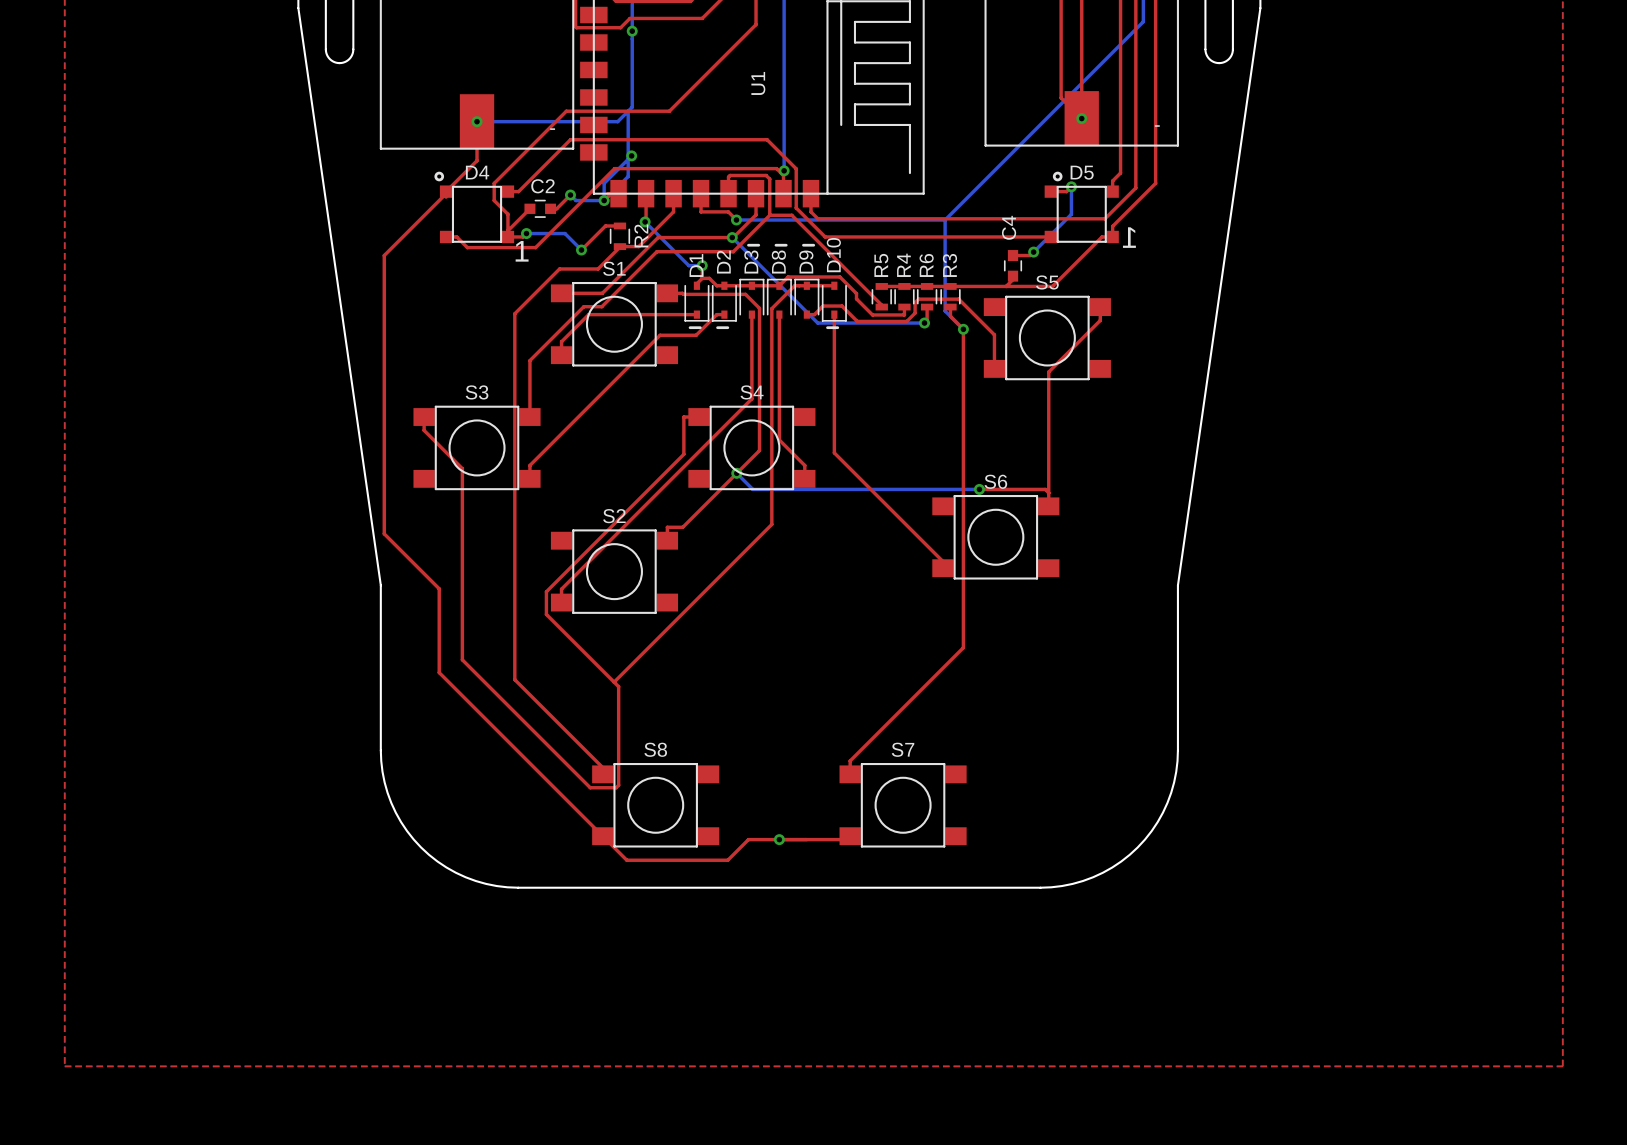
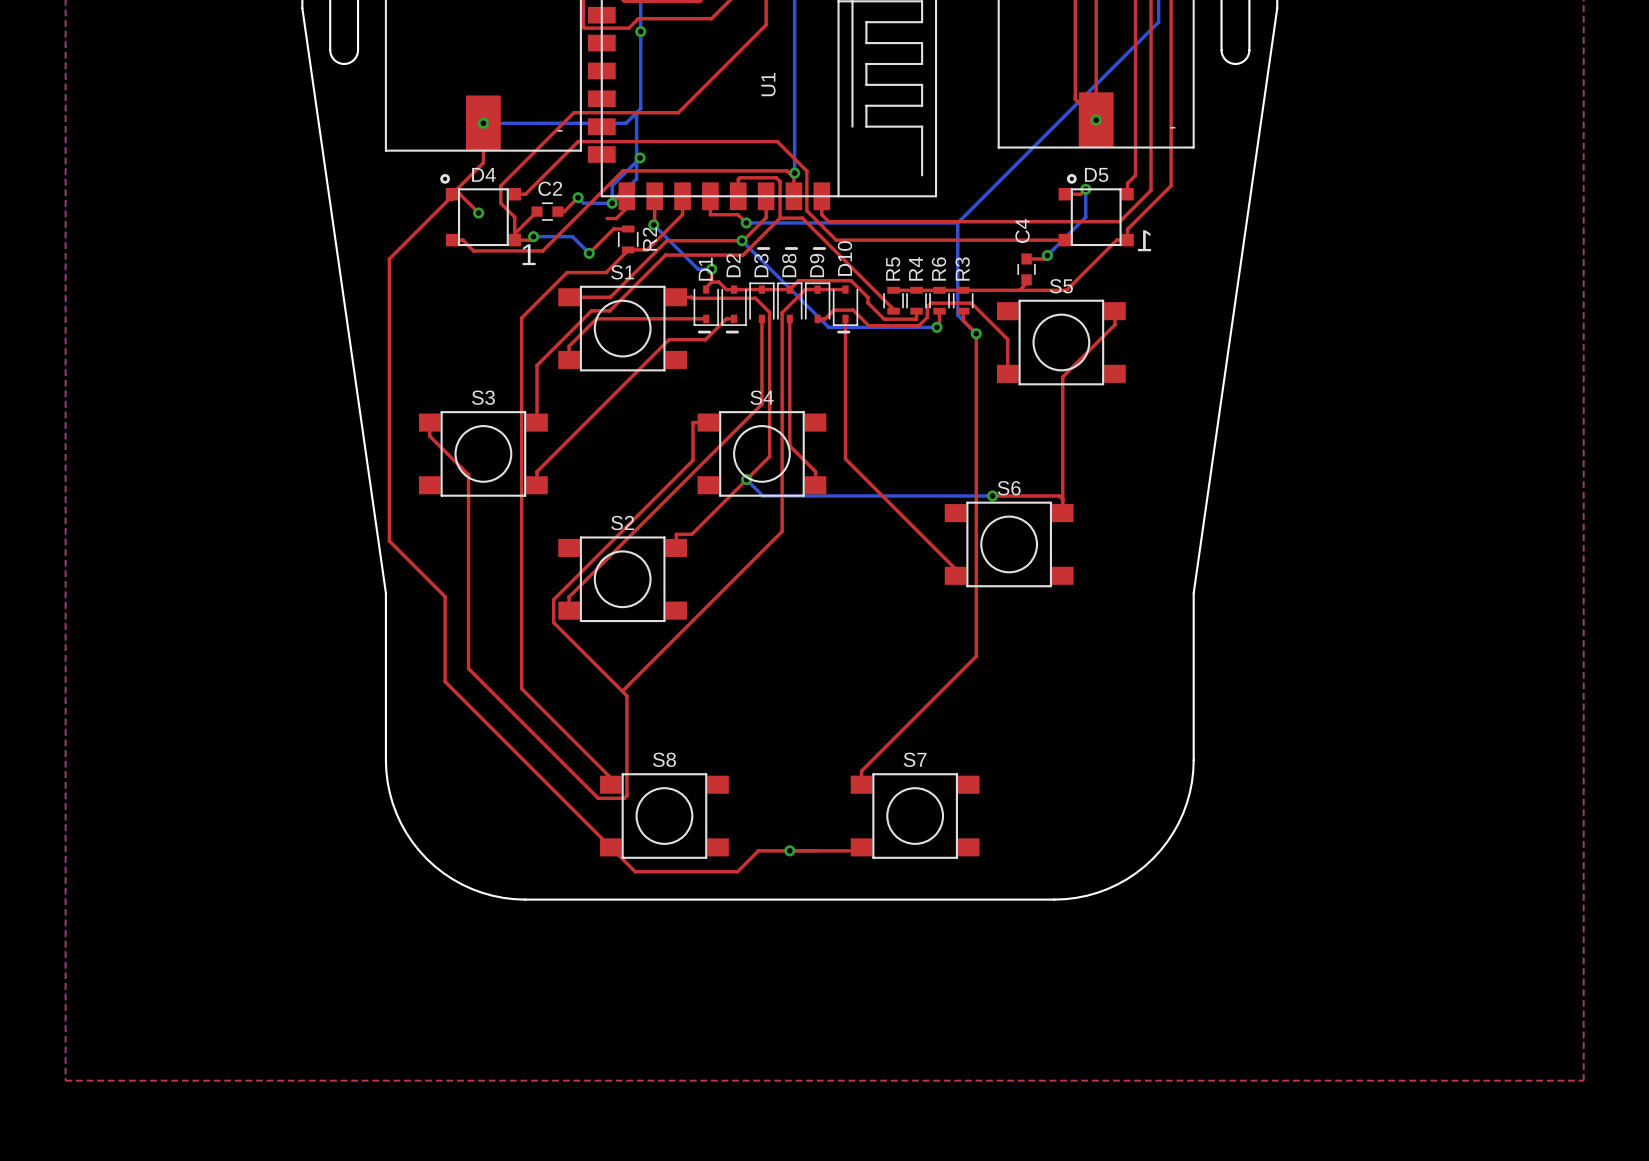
top track: none -> (452, 194) (459, 194) (478, 212)
top track: none -> (626, 196) (626, 207) (616, 218) (607, 218)
via: none -> (478, 212)

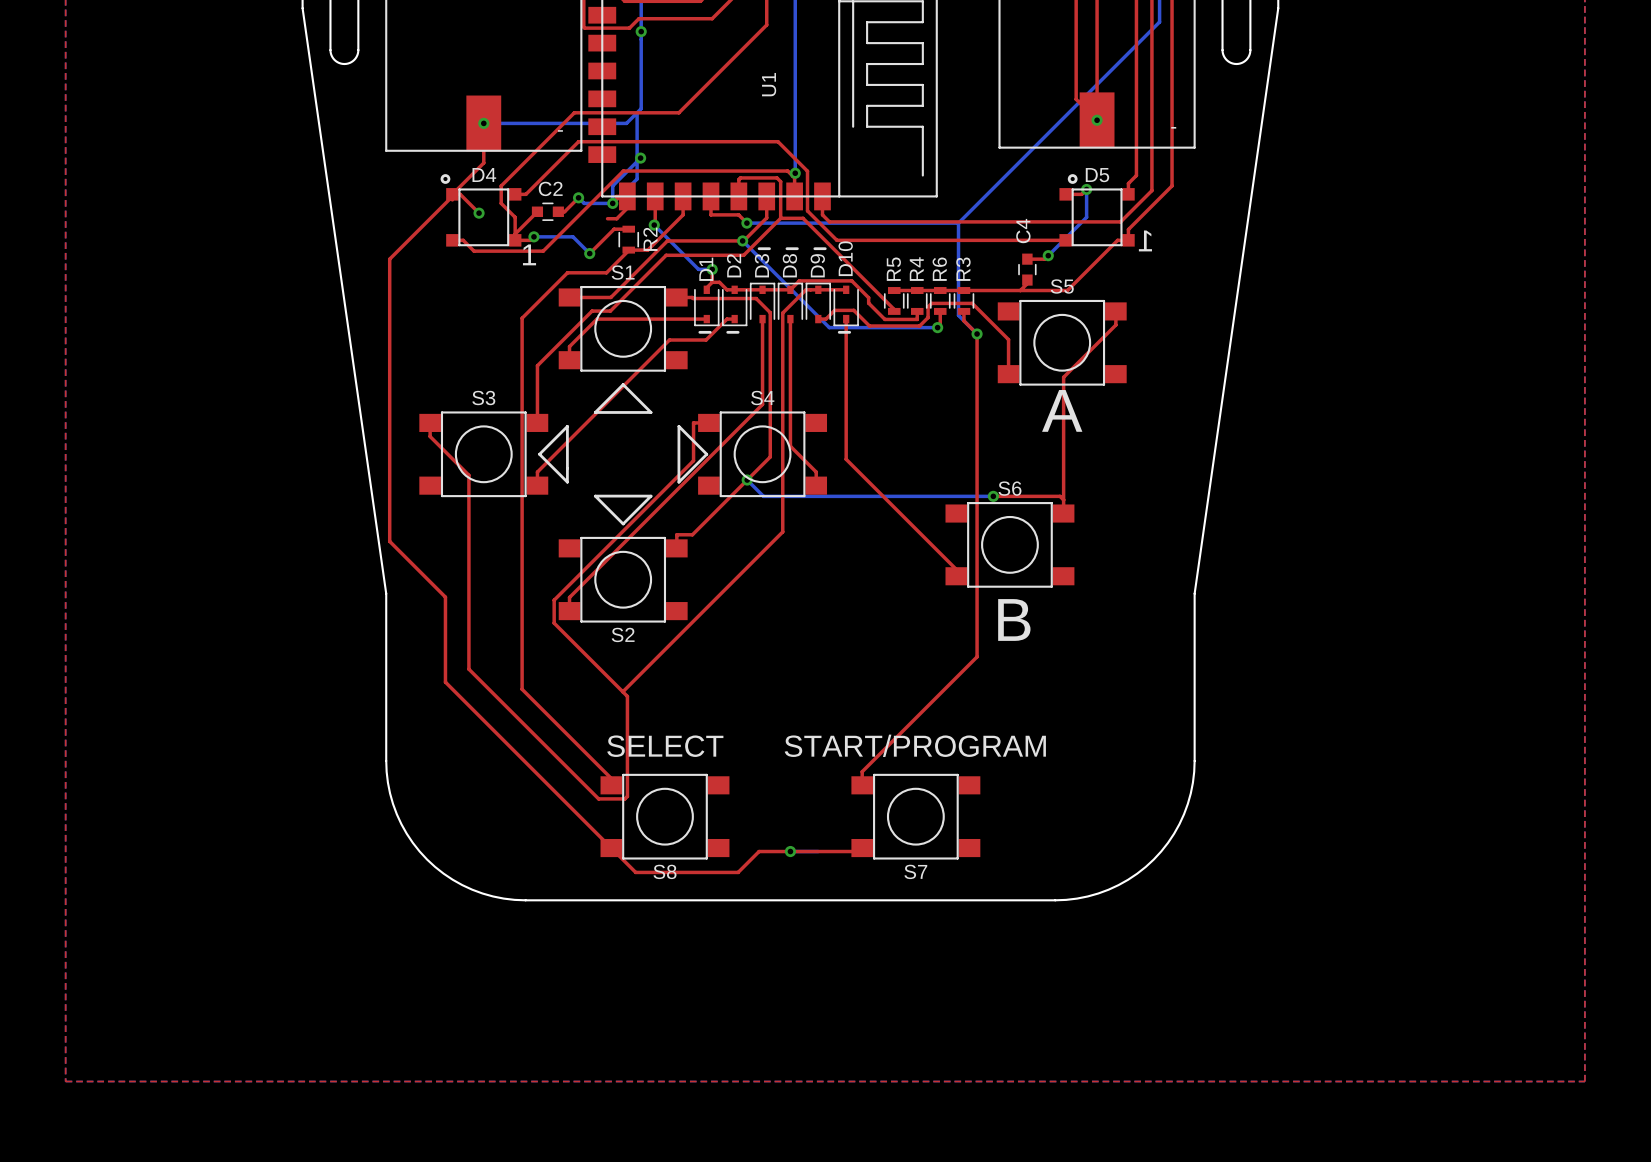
line: none -> (623, 384) (651, 412) (595, 412) (623, 384)
text: none -> A (1062, 410)
line: none -> (567, 426) (567, 482) (539, 454) (567, 426)
line: none -> (678, 426) (678, 482) (706, 454) (678, 426)
line: none -> (595, 496) (651, 496) (623, 523) (595, 496)
S2 name position: S2 (622, 523) -> S2 (623, 634)
text: none -> B (1014, 619)
text: none -> SELECT (665, 746)
text: none -> START/PROGRAM (915, 745)
S8 name position: S8 (664, 759) -> S8 (665, 871)
S7 name position: S7 (915, 759) -> S7 (915, 871)

